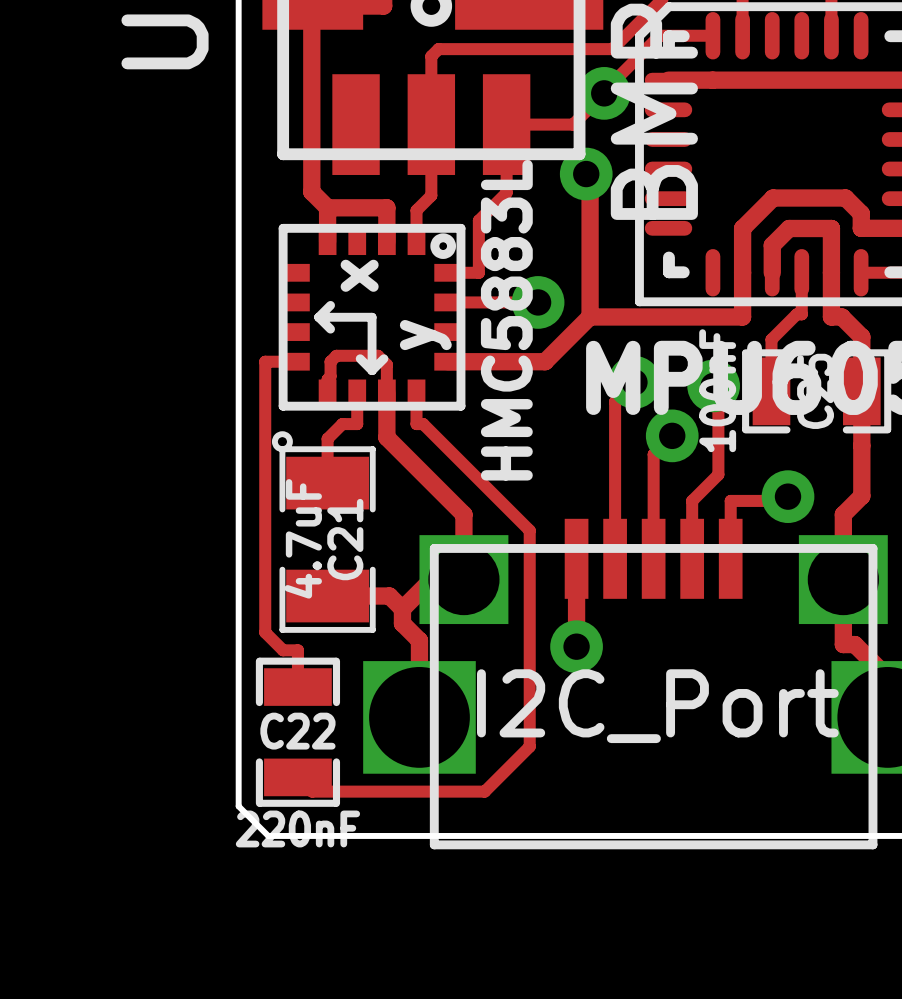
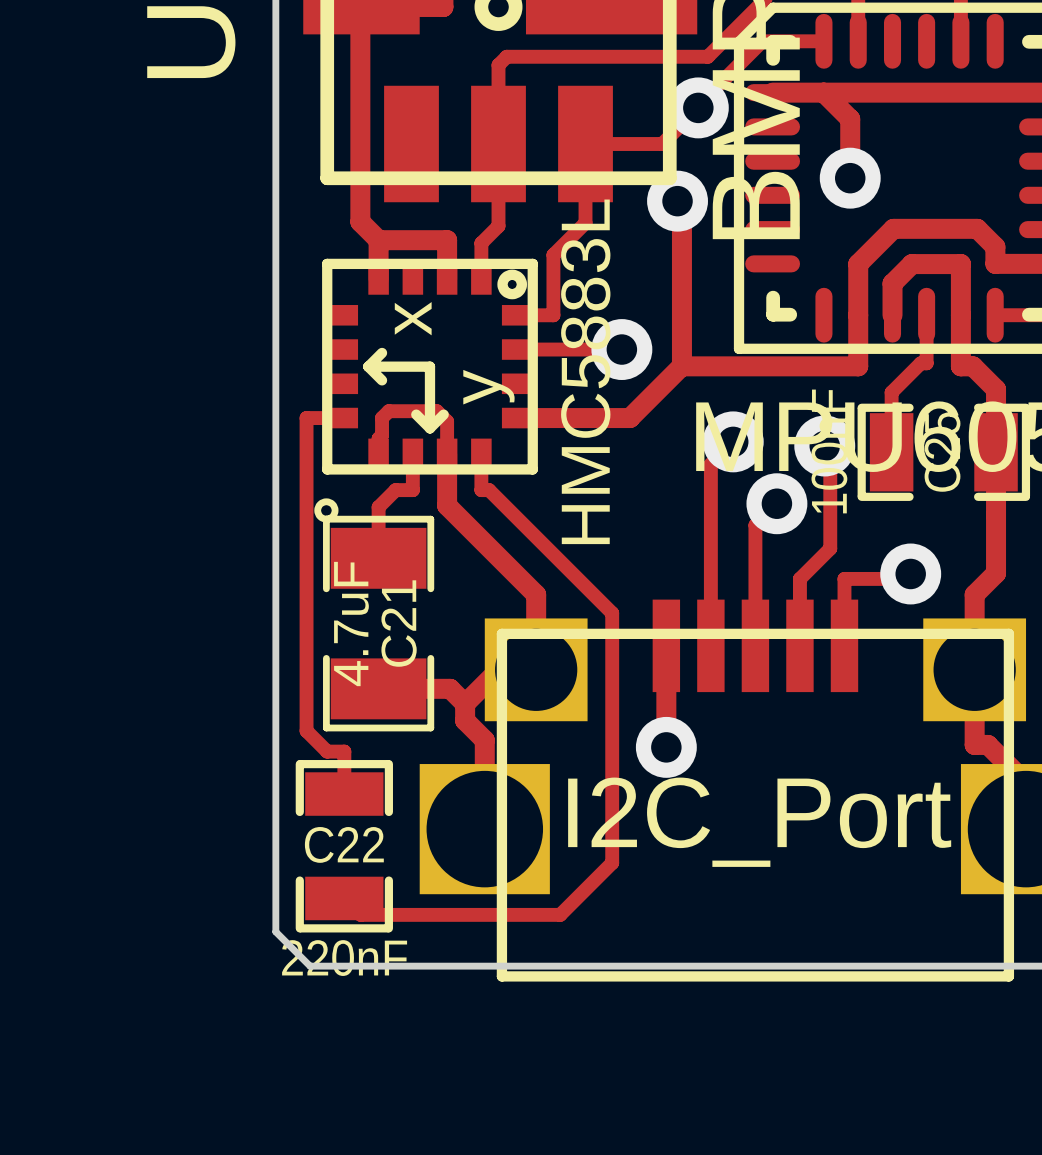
track: none -> (823, 92) (850, 119) (850, 178)
via: none -> (850, 178)

